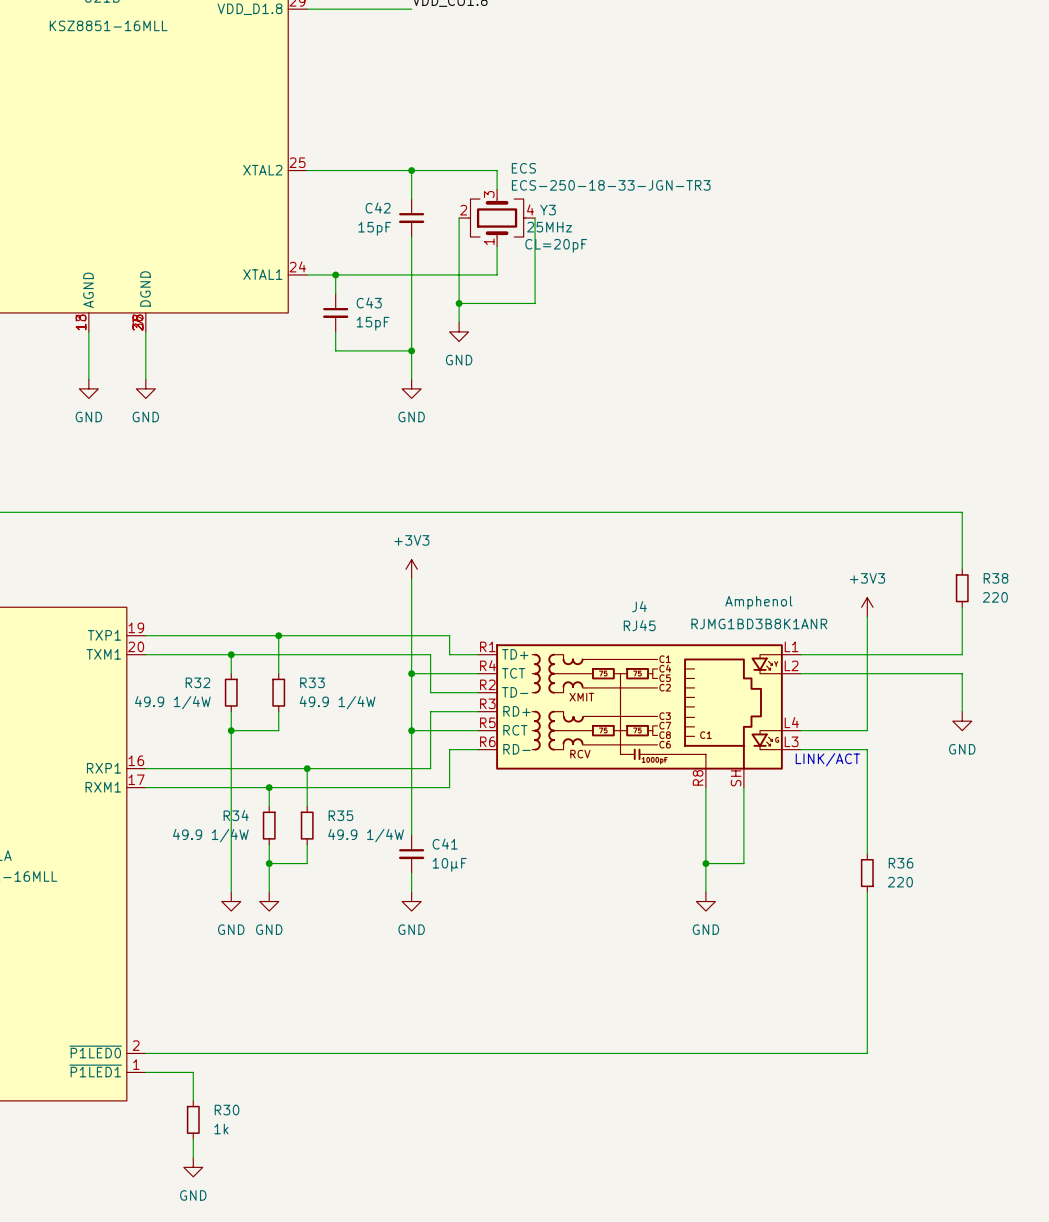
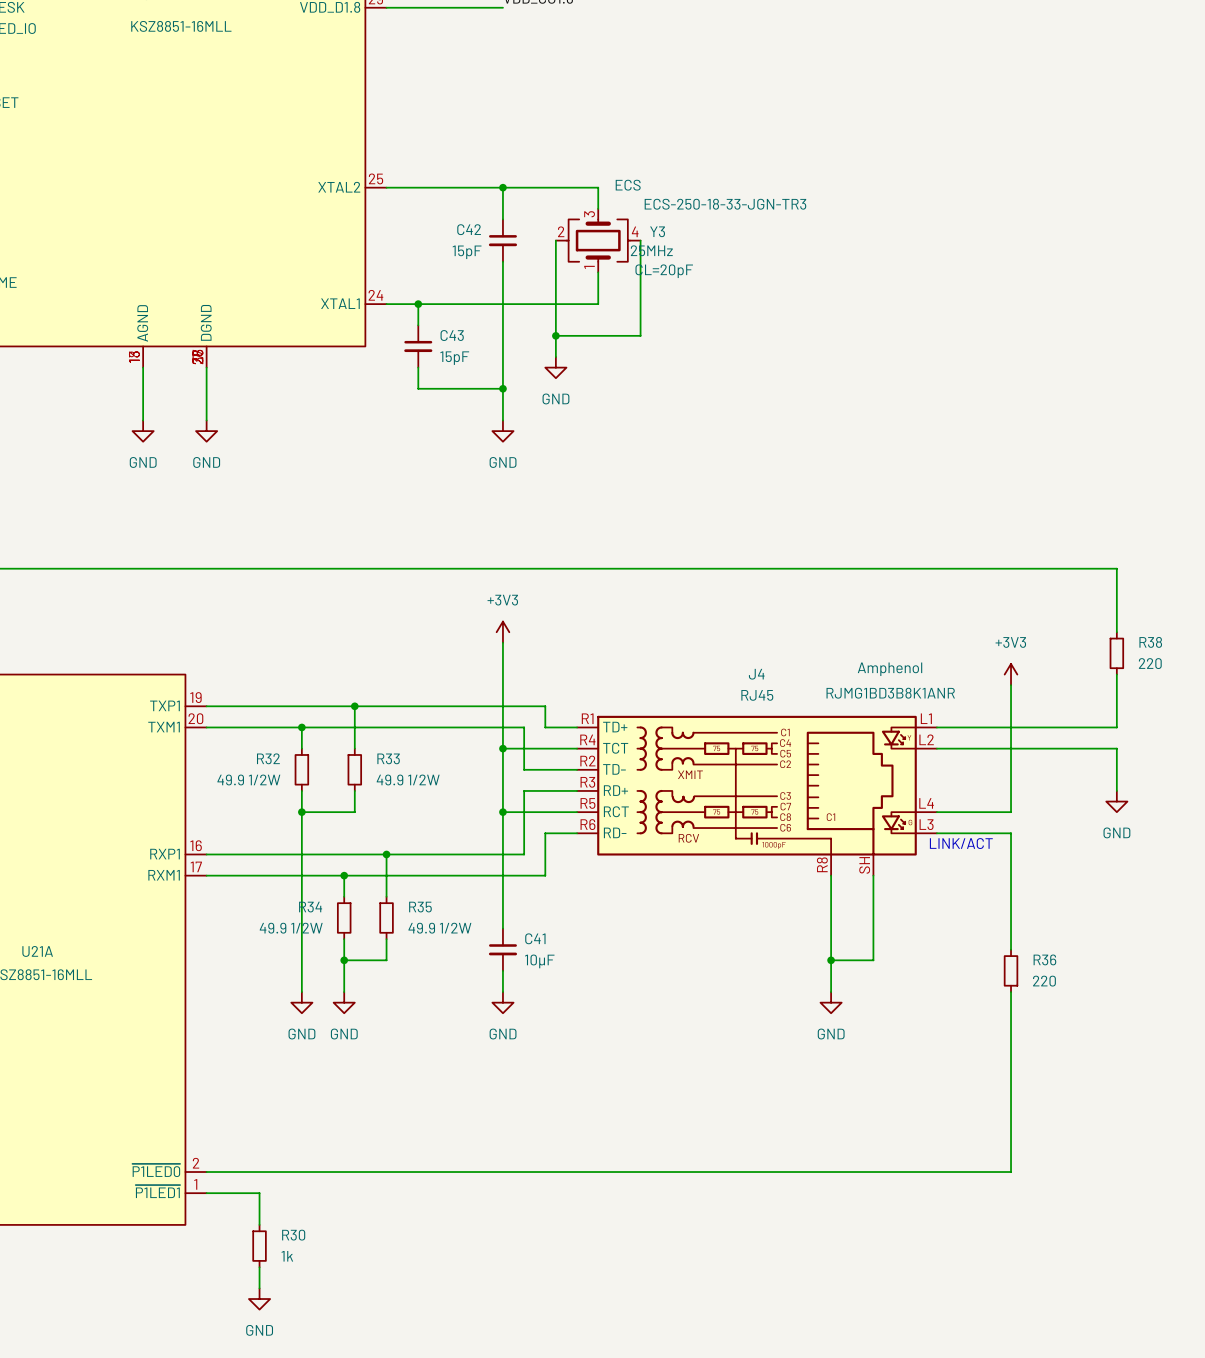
R32 value: 49.9 1/4W (172, 702) -> 49.9 1/2W (248, 779)
R33 value: 49.9 1/4W (337, 702) -> 49.9 1/2W (408, 779)
R34 value: 49.9 1/4W (210, 835) -> 49.9 1/2W (291, 928)
R35 value: 49.9 1/4W (366, 835) -> 49.9 1/2W (439, 928)

